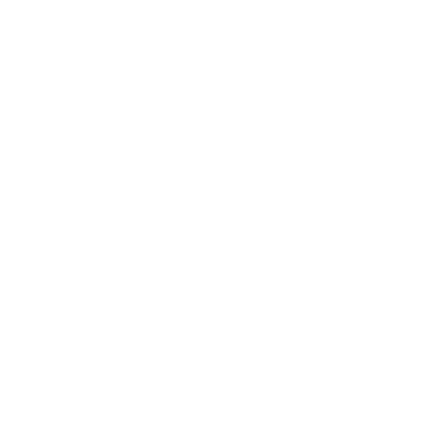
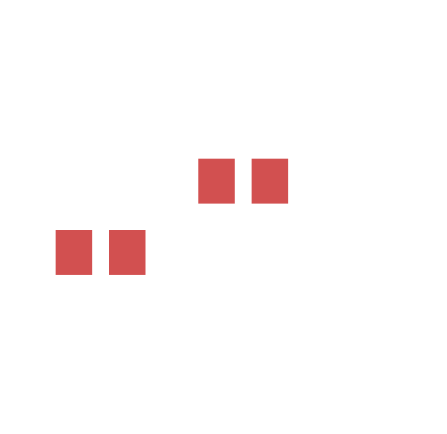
part: none -> (243, 181)
part: none -> (100, 252)

